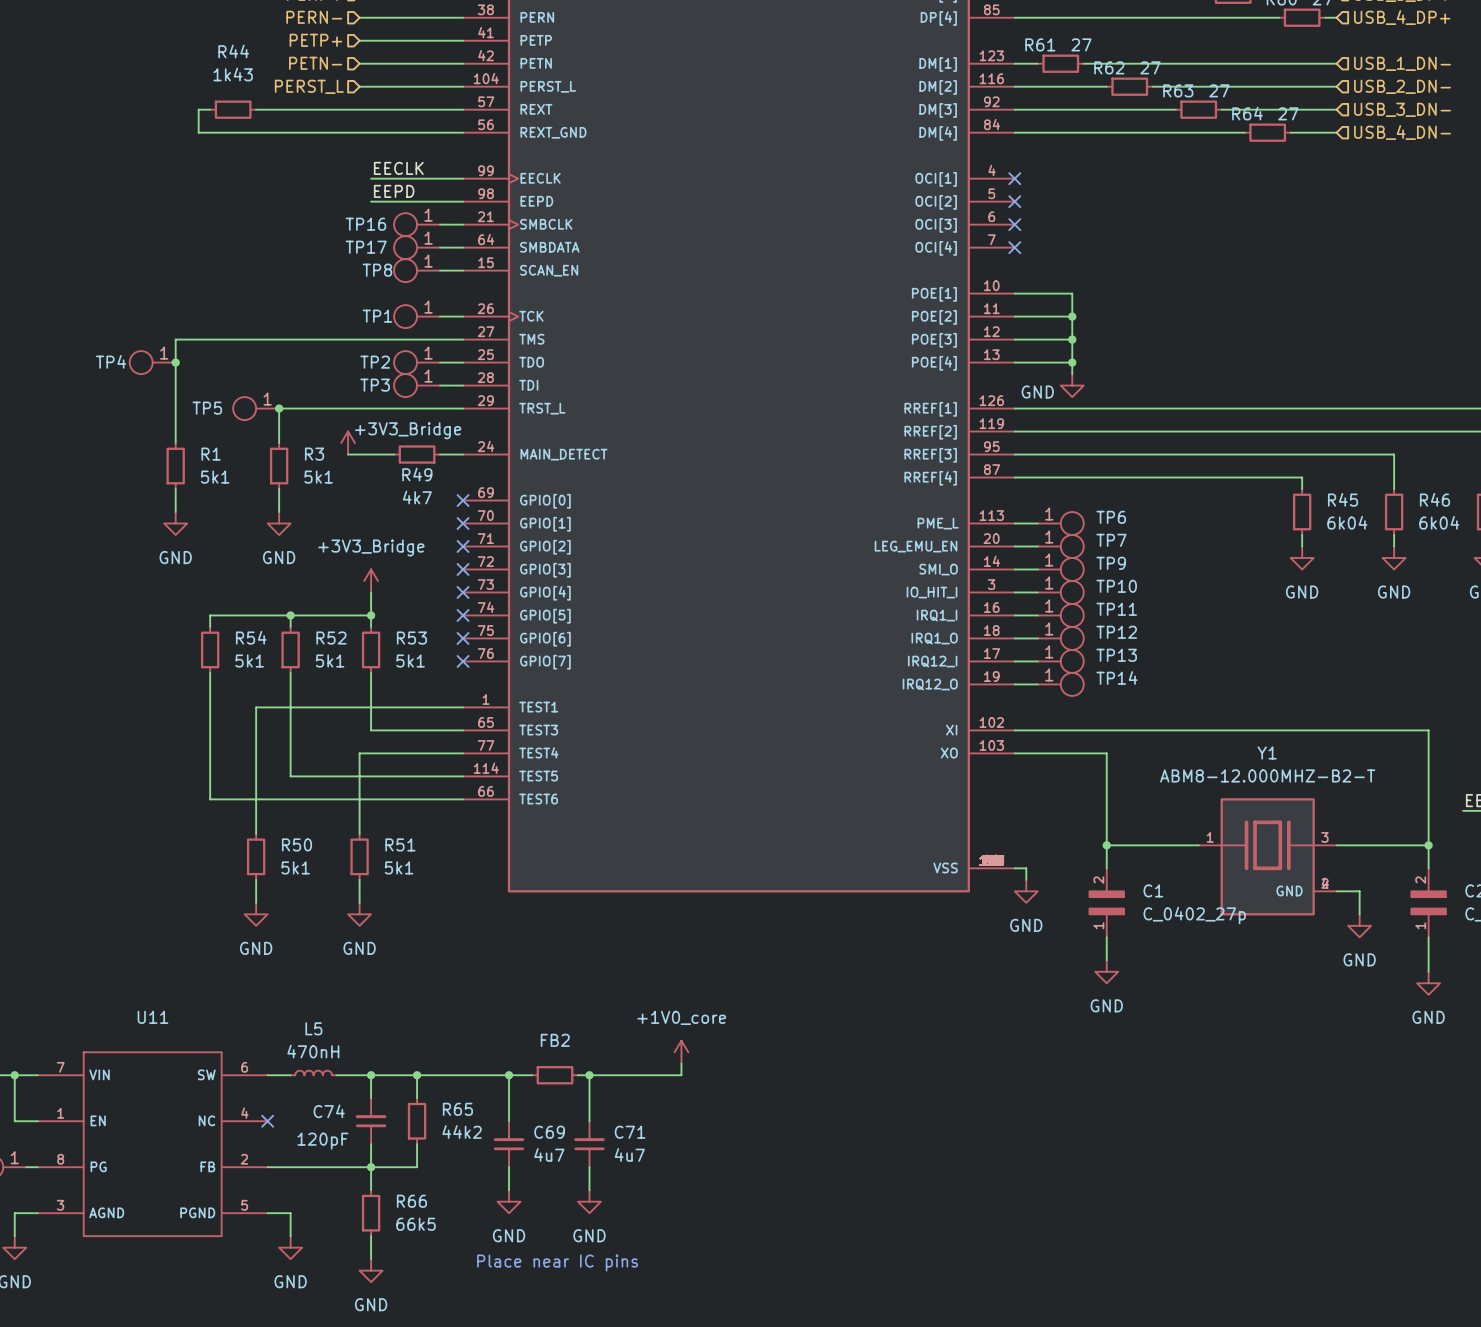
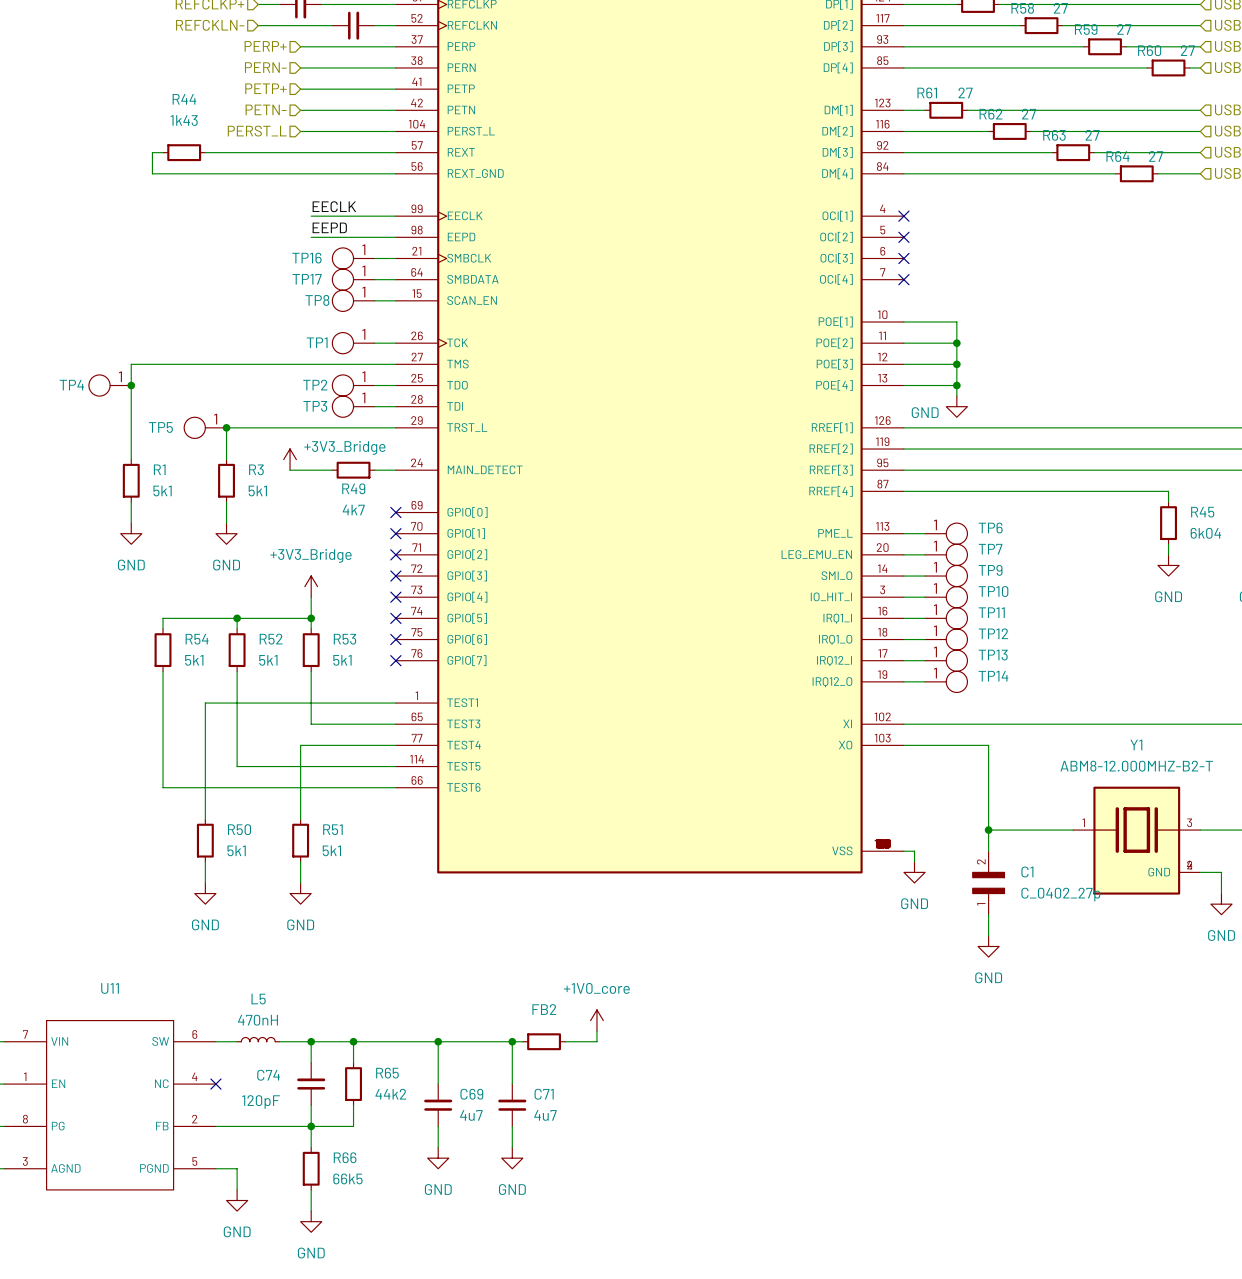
FB2 position: (555, 1075) -> (544, 1041)
wire: (600, 1075) (646, 1075) -> (459, 1041) (501, 1041)
text: Place near IC pins (557, 1262) -> none

